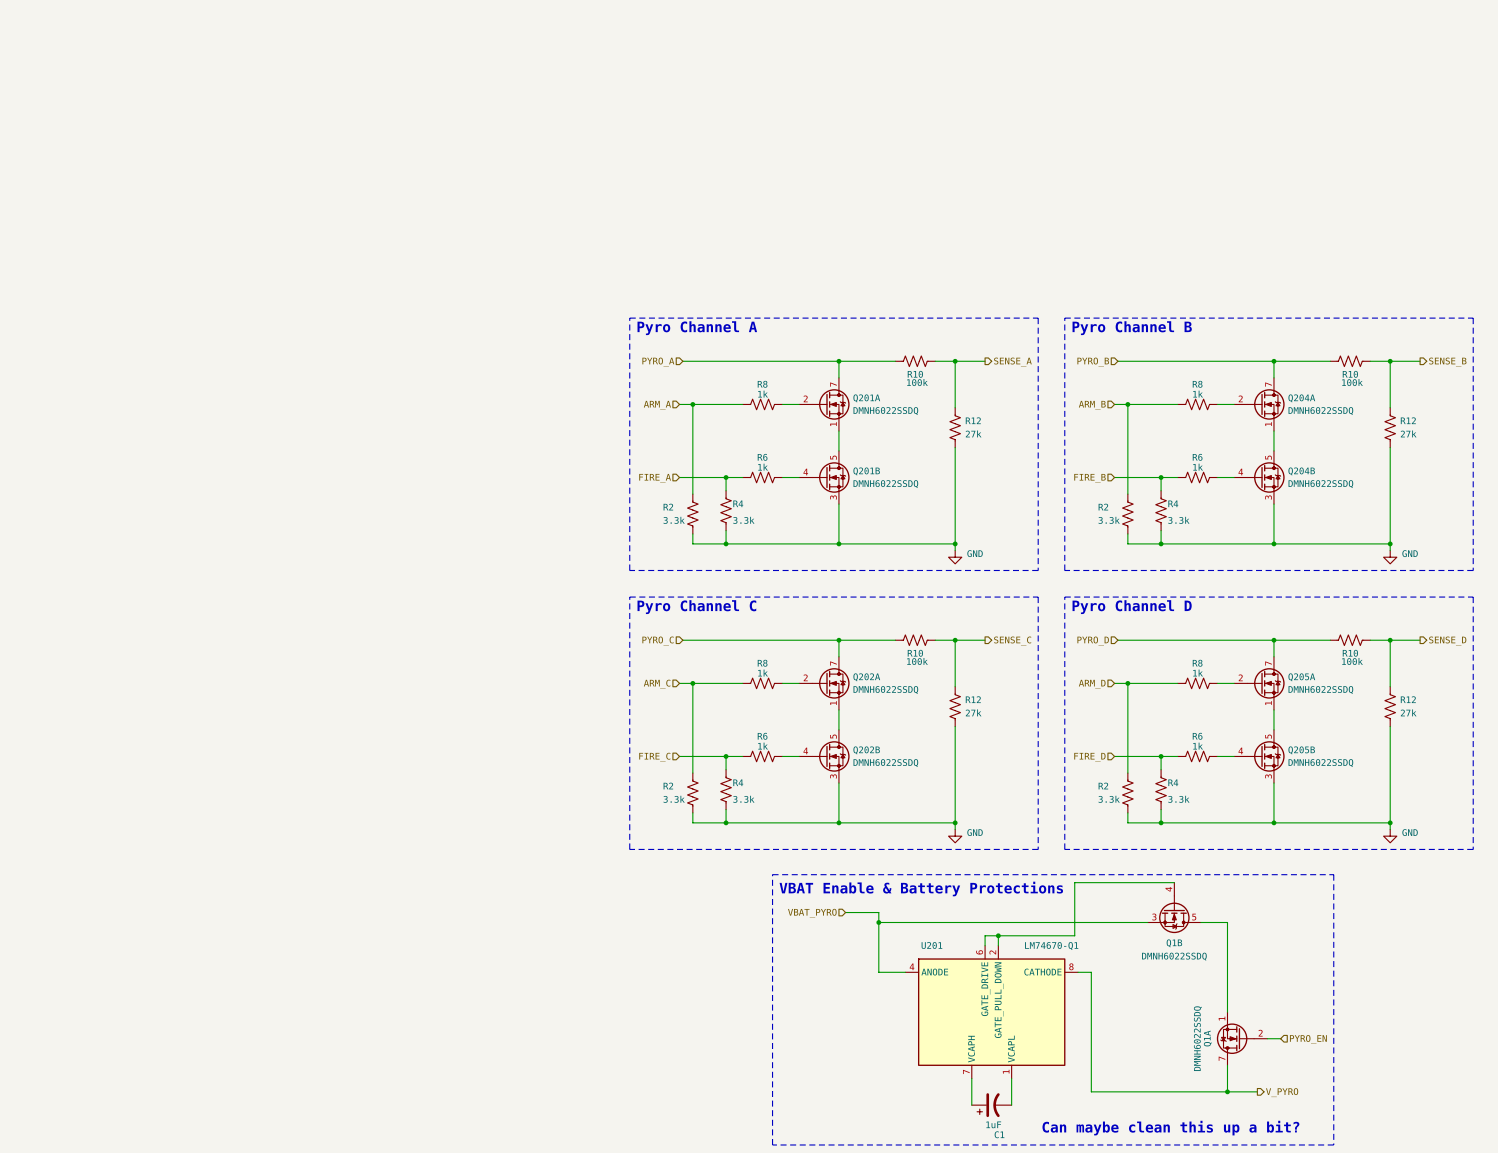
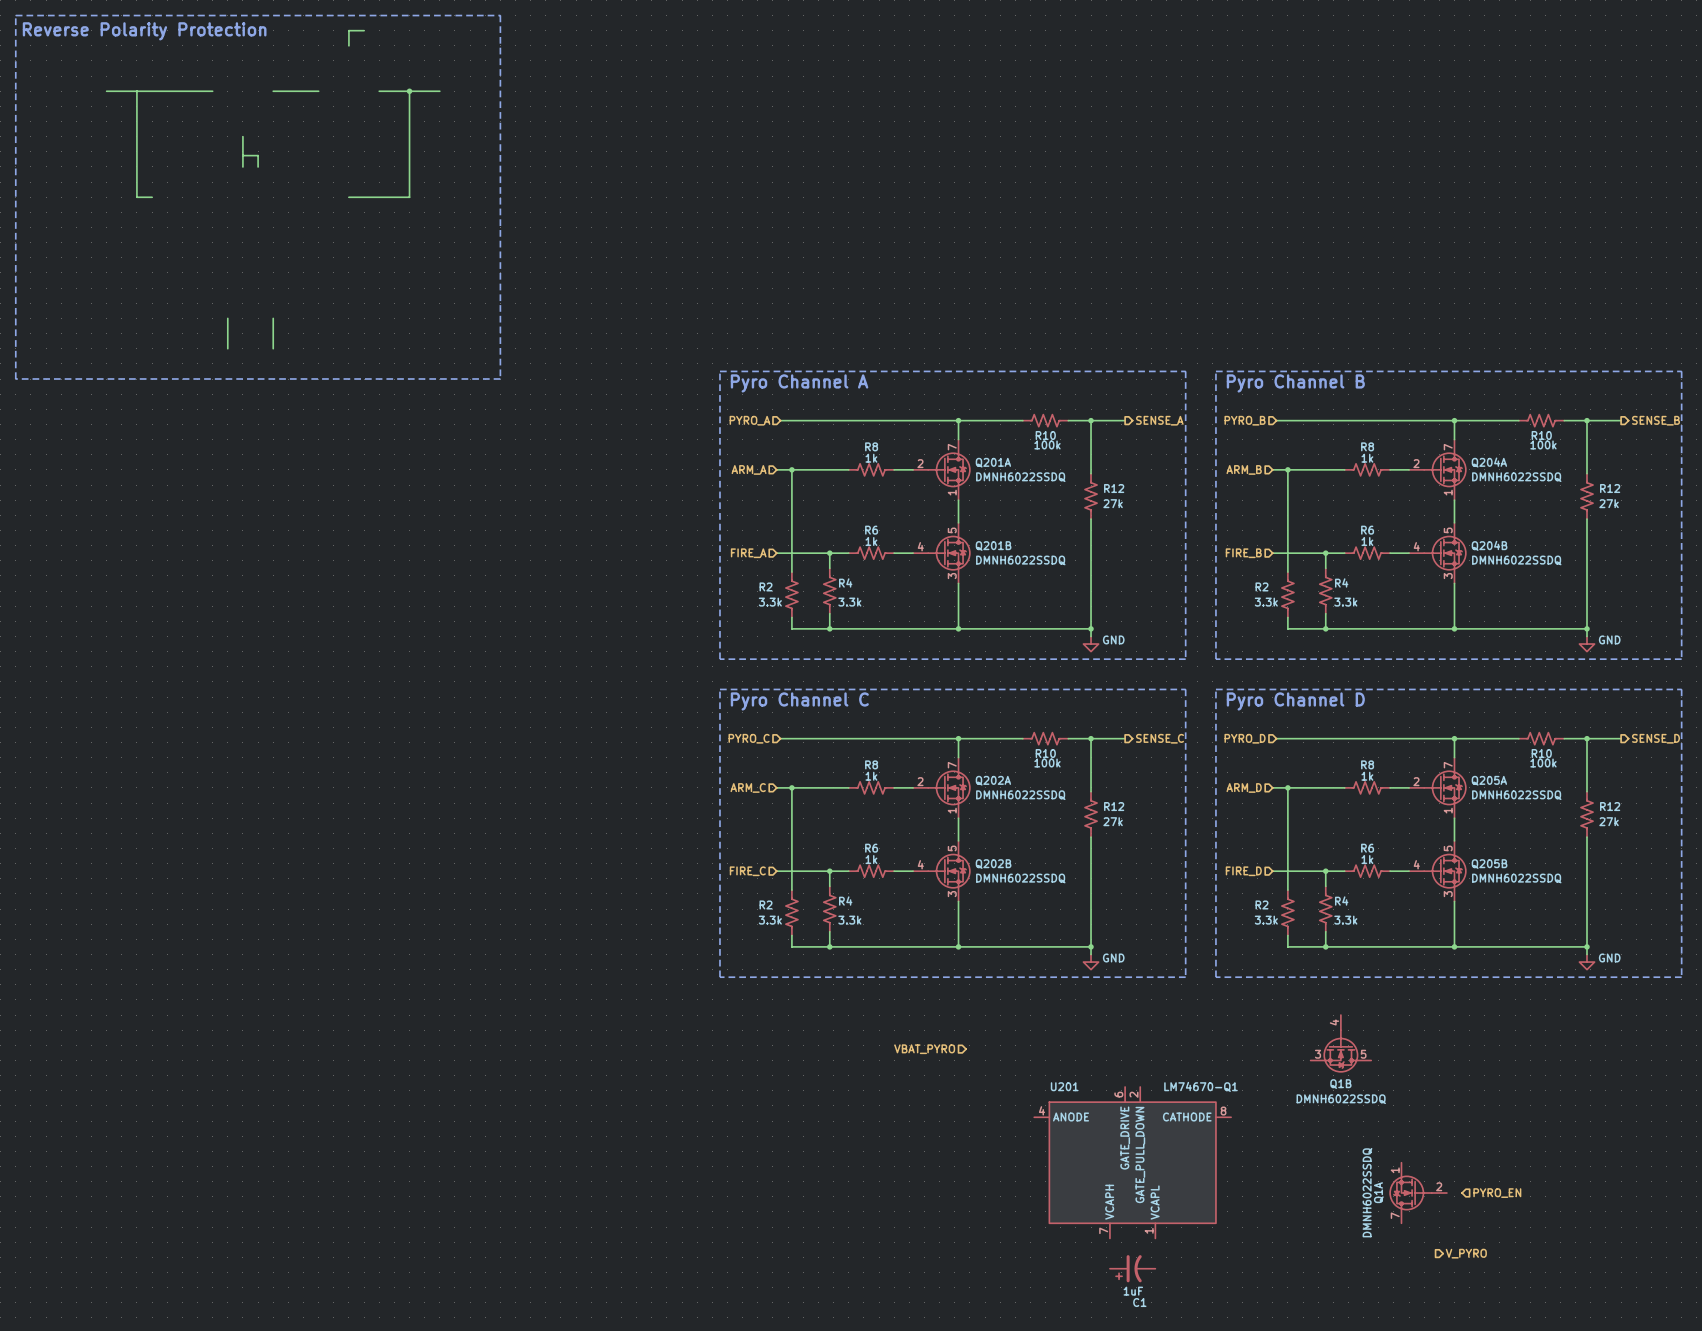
line: none -> (15, 15) (500, 15) (500, 379) (15, 379) (15, 15)
text: none -> Reverse Polarity Protection (144, 31)
wire: none -> (364, 30) (348, 30) (348, 45)
wire: none -> (106, 91) (212, 91)
wire: none -> (136, 91) (136, 197) (152, 197)
wire: none -> (273, 91) (318, 91)
wire: none -> (379, 91) (439, 91)
wire: none -> (409, 91) (409, 197) (348, 197)
junction: none -> (409, 91)
wire: none -> (242, 136) (242, 166)
wire: none -> (242, 155) (258, 155) (258, 166)
wire: none -> (227, 318) (227, 348)
wire: none -> (273, 318) (273, 348)
line: (772, 874) (1333, 874) (1333, 1144) (772, 1144) (772, 874) -> none
wire: (1174, 882) (1074, 882) (1074, 935) (985, 935) (985, 945) -> none
text: VBAT Enable & Battery Protections (921, 888) -> none
wire: (845, 912) (878, 912) (878, 972) (905, 972) -> none
wire: (878, 922) (1147, 922) -> none
junction: (878, 922) -> none
wire: (1200, 922) (1227, 922) (1227, 1012) -> none
wire: (998, 935) (998, 945) -> none
junction: (998, 935) -> none
wire: (1078, 972) (1091, 972) (1091, 1091) (1257, 1091) -> none
wire: (1267, 1038) (1280, 1038) -> none
wire: (1227, 1065) (1227, 1091) -> none
wire: (971, 1078) (971, 1105) -> none
wire: (1011, 1078) (1011, 1105) -> none
junction: (1227, 1091) -> none
text: Can maybe clean this up a bit? (1170, 1128) -> none

